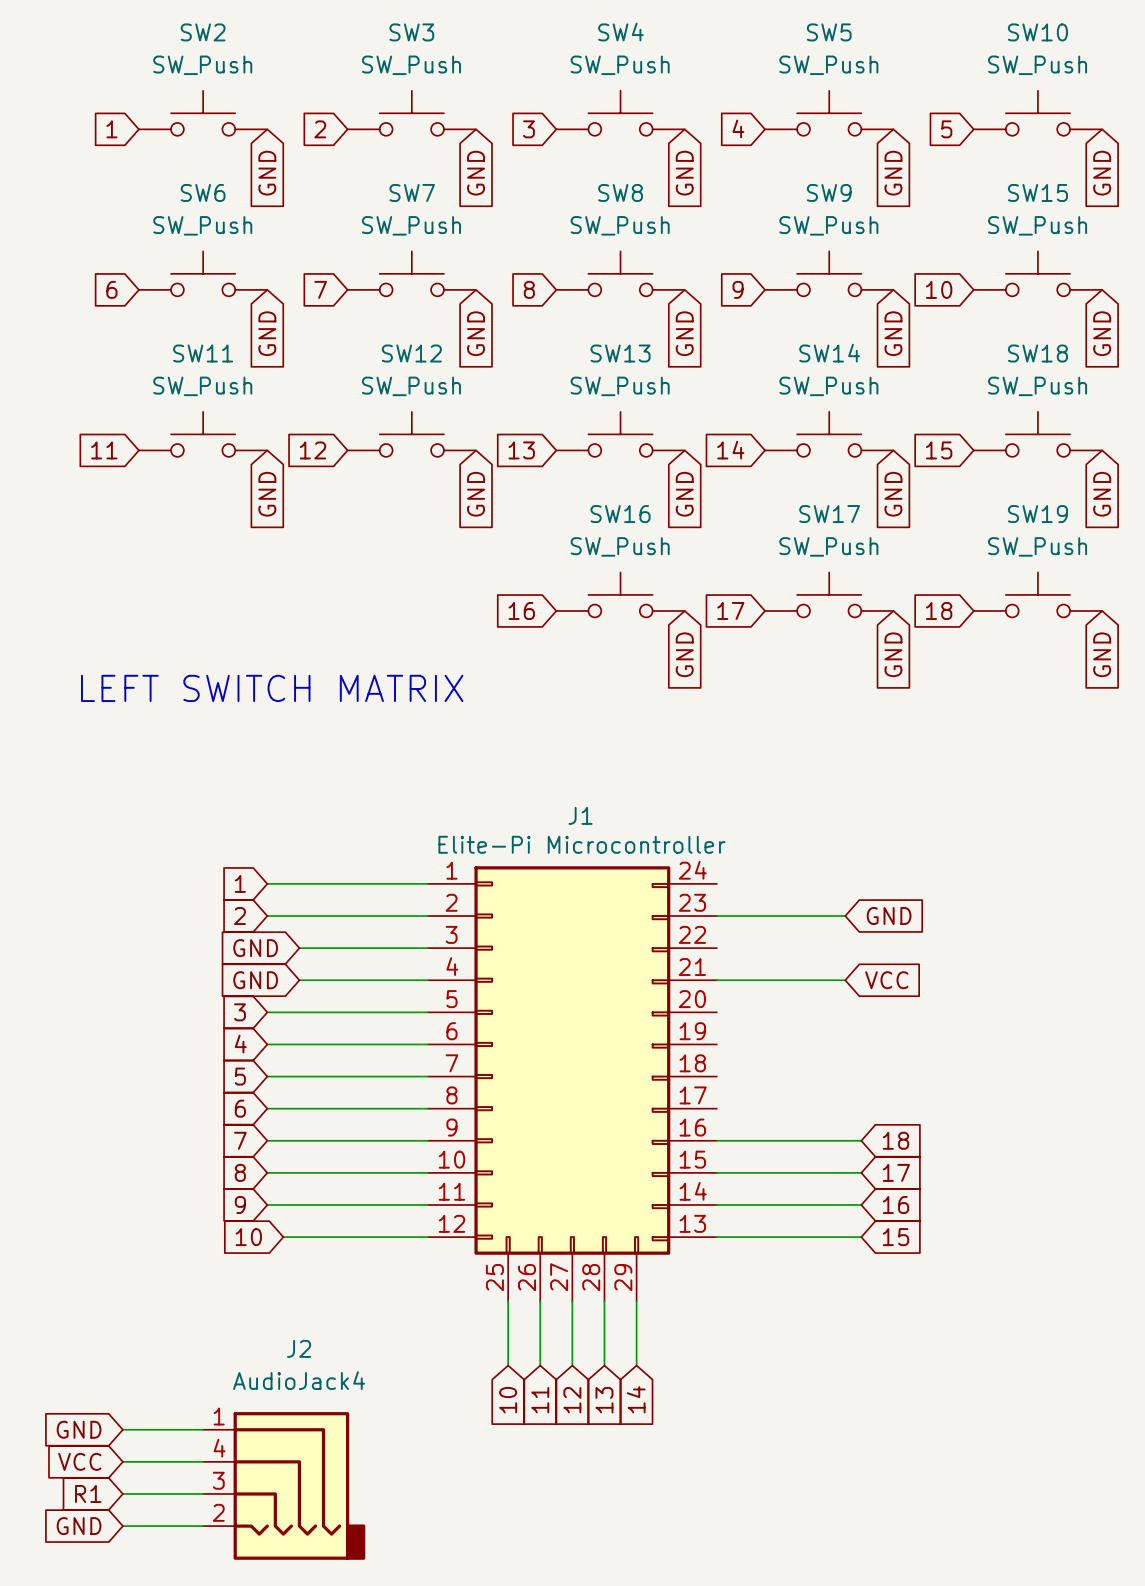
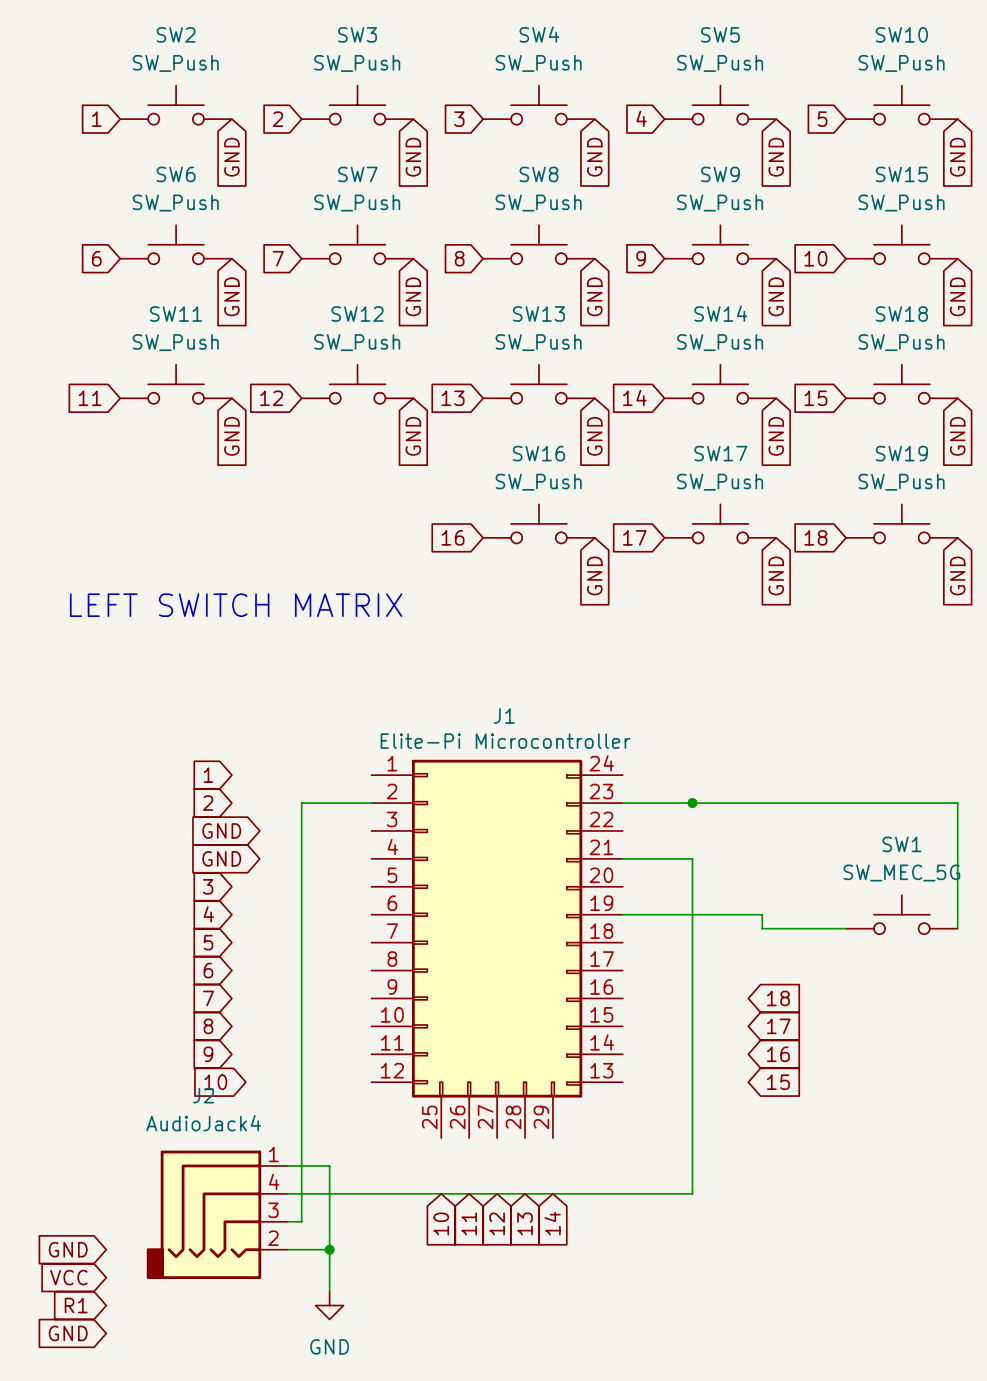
wire: (267, 883) (427, 883) -> none
wire: (267, 916) (347, 916) -> (287, 1221) (301, 1221) (301, 803)
junction: none -> (692, 803)
wire: none -> (734, 803) (957, 803) (957, 928)
global label: GND (889, 916) -> none
wire: (299, 948) (427, 948) -> none
wire: (299, 980) (427, 980) -> none
wire: (797, 980) (845, 980) -> (692, 858) (692, 1193) (287, 1193)
global label: VCC (886, 980) -> none
wire: (267, 1012) (427, 1012) -> none
wire: (267, 1044) (427, 1044) -> none
wire: none -> (622, 914) (762, 914) (762, 928) (846, 928)
SW1: none -> SW_MEC_5G (901, 914)
wire: (267, 1076) (427, 1076) -> none
wire: (267, 1108) (427, 1108) -> none
wire: (267, 1140) (427, 1140) -> none
wire: (716, 1140) (861, 1140) -> none
wire: (267, 1172) (427, 1172) -> none
wire: (716, 1172) (861, 1172) -> none
wire: (267, 1205) (427, 1205) -> none
wire: (716, 1205) (861, 1205) -> none
wire: (283, 1237) (427, 1237) -> none
wire: (716, 1237) (861, 1237) -> none
wire: (508, 1301) (508, 1365) -> none
wire: (540, 1301) (540, 1365) -> none
wire: (572, 1301) (572, 1365) -> none
wire: (604, 1301) (604, 1365) -> none
wire: (636, 1301) (636, 1365) -> none
wire: none -> (287, 1165) (329, 1165) (329, 1291)
wire: (122, 1429) (203, 1429) -> none
wire: none -> (287, 1249) (329, 1249)
junction: none -> (329, 1249)
wire: (122, 1461) (203, 1461) -> none
J2 position: (284, 1485) -> (217, 1214)
J2 flip: as is (299, 1485) -> left-right (204, 1214)
wire: (122, 1493) (203, 1493) -> none
power symbol: none -> GND (329, 1305)
wire: (122, 1526) (203, 1526) -> none

